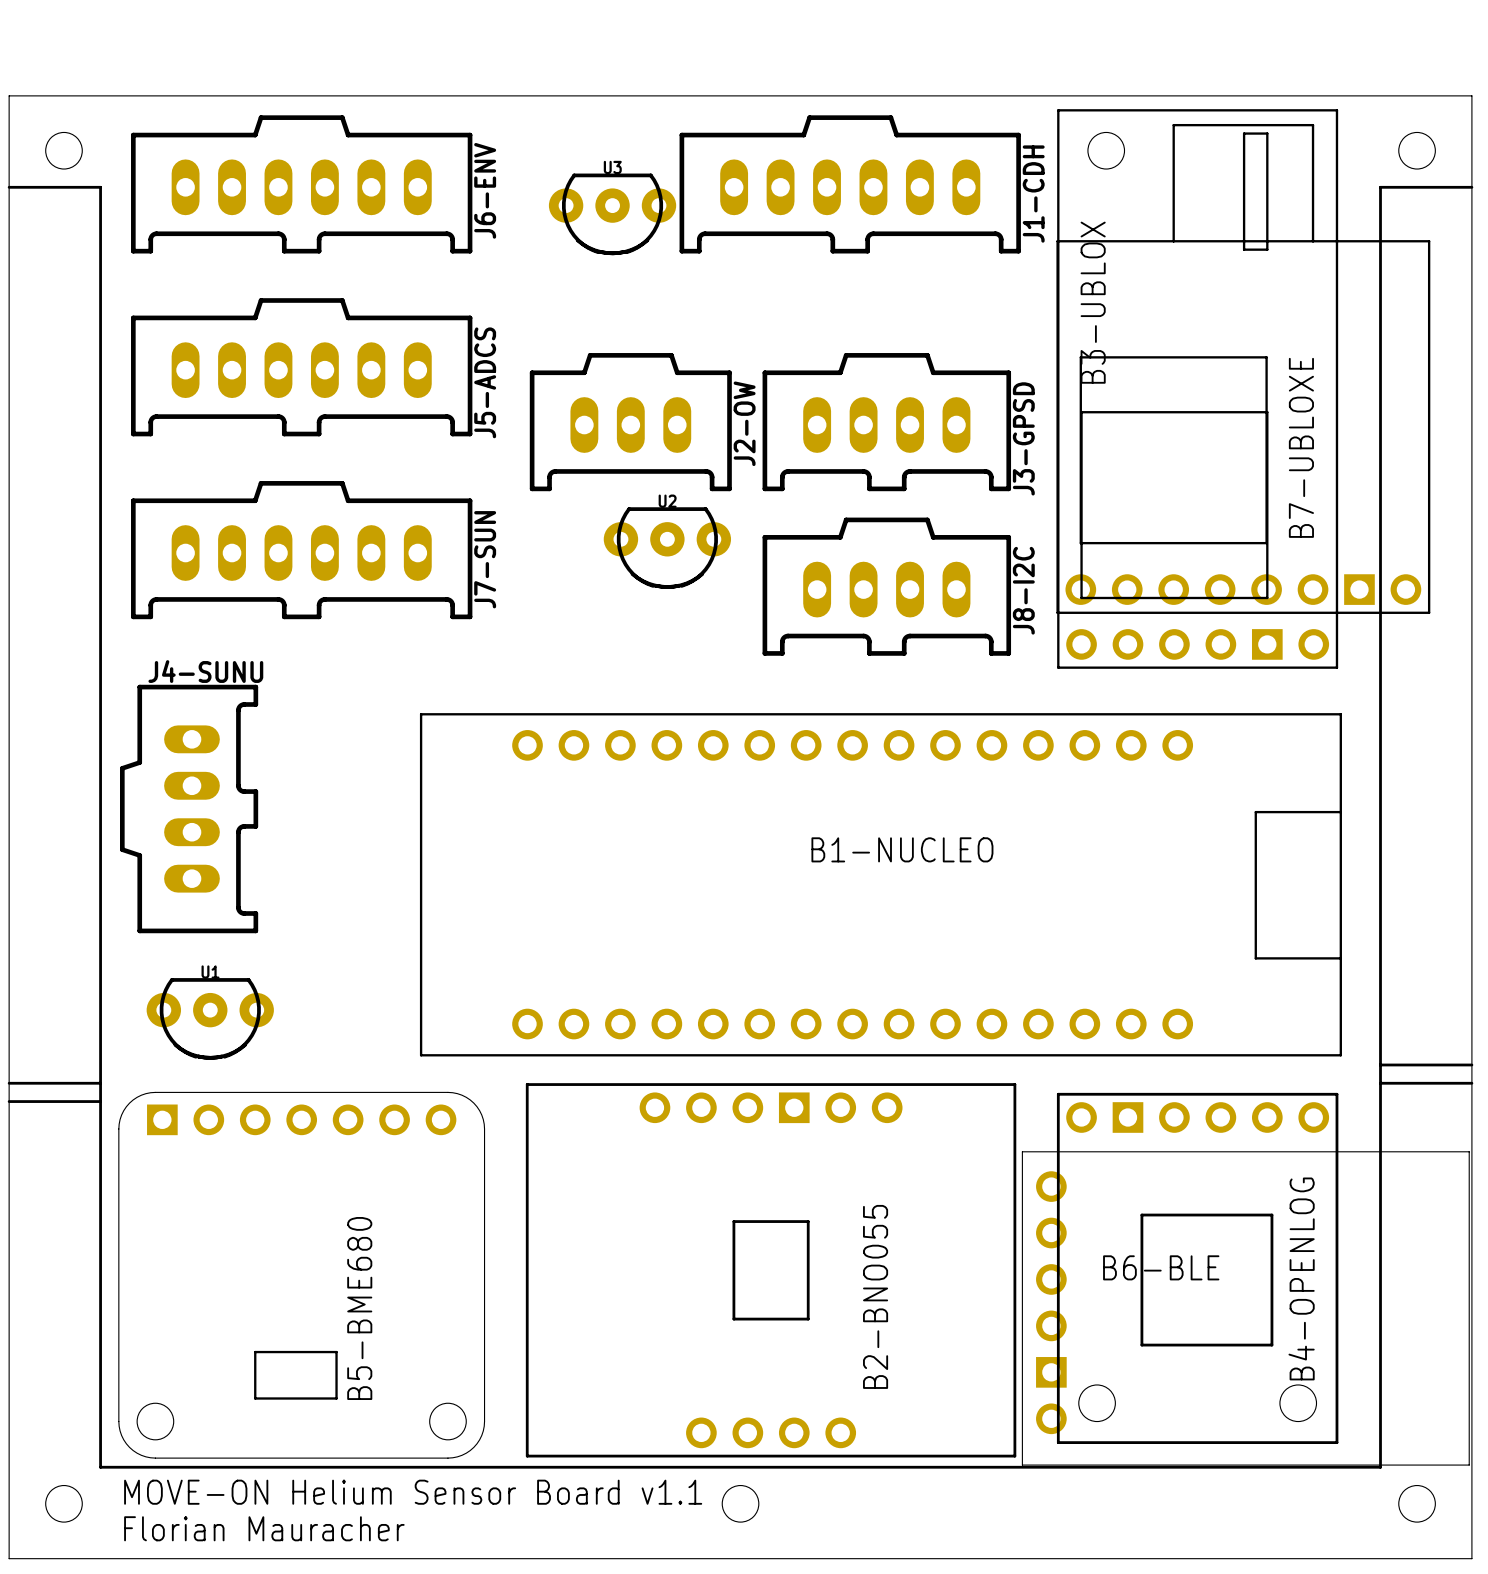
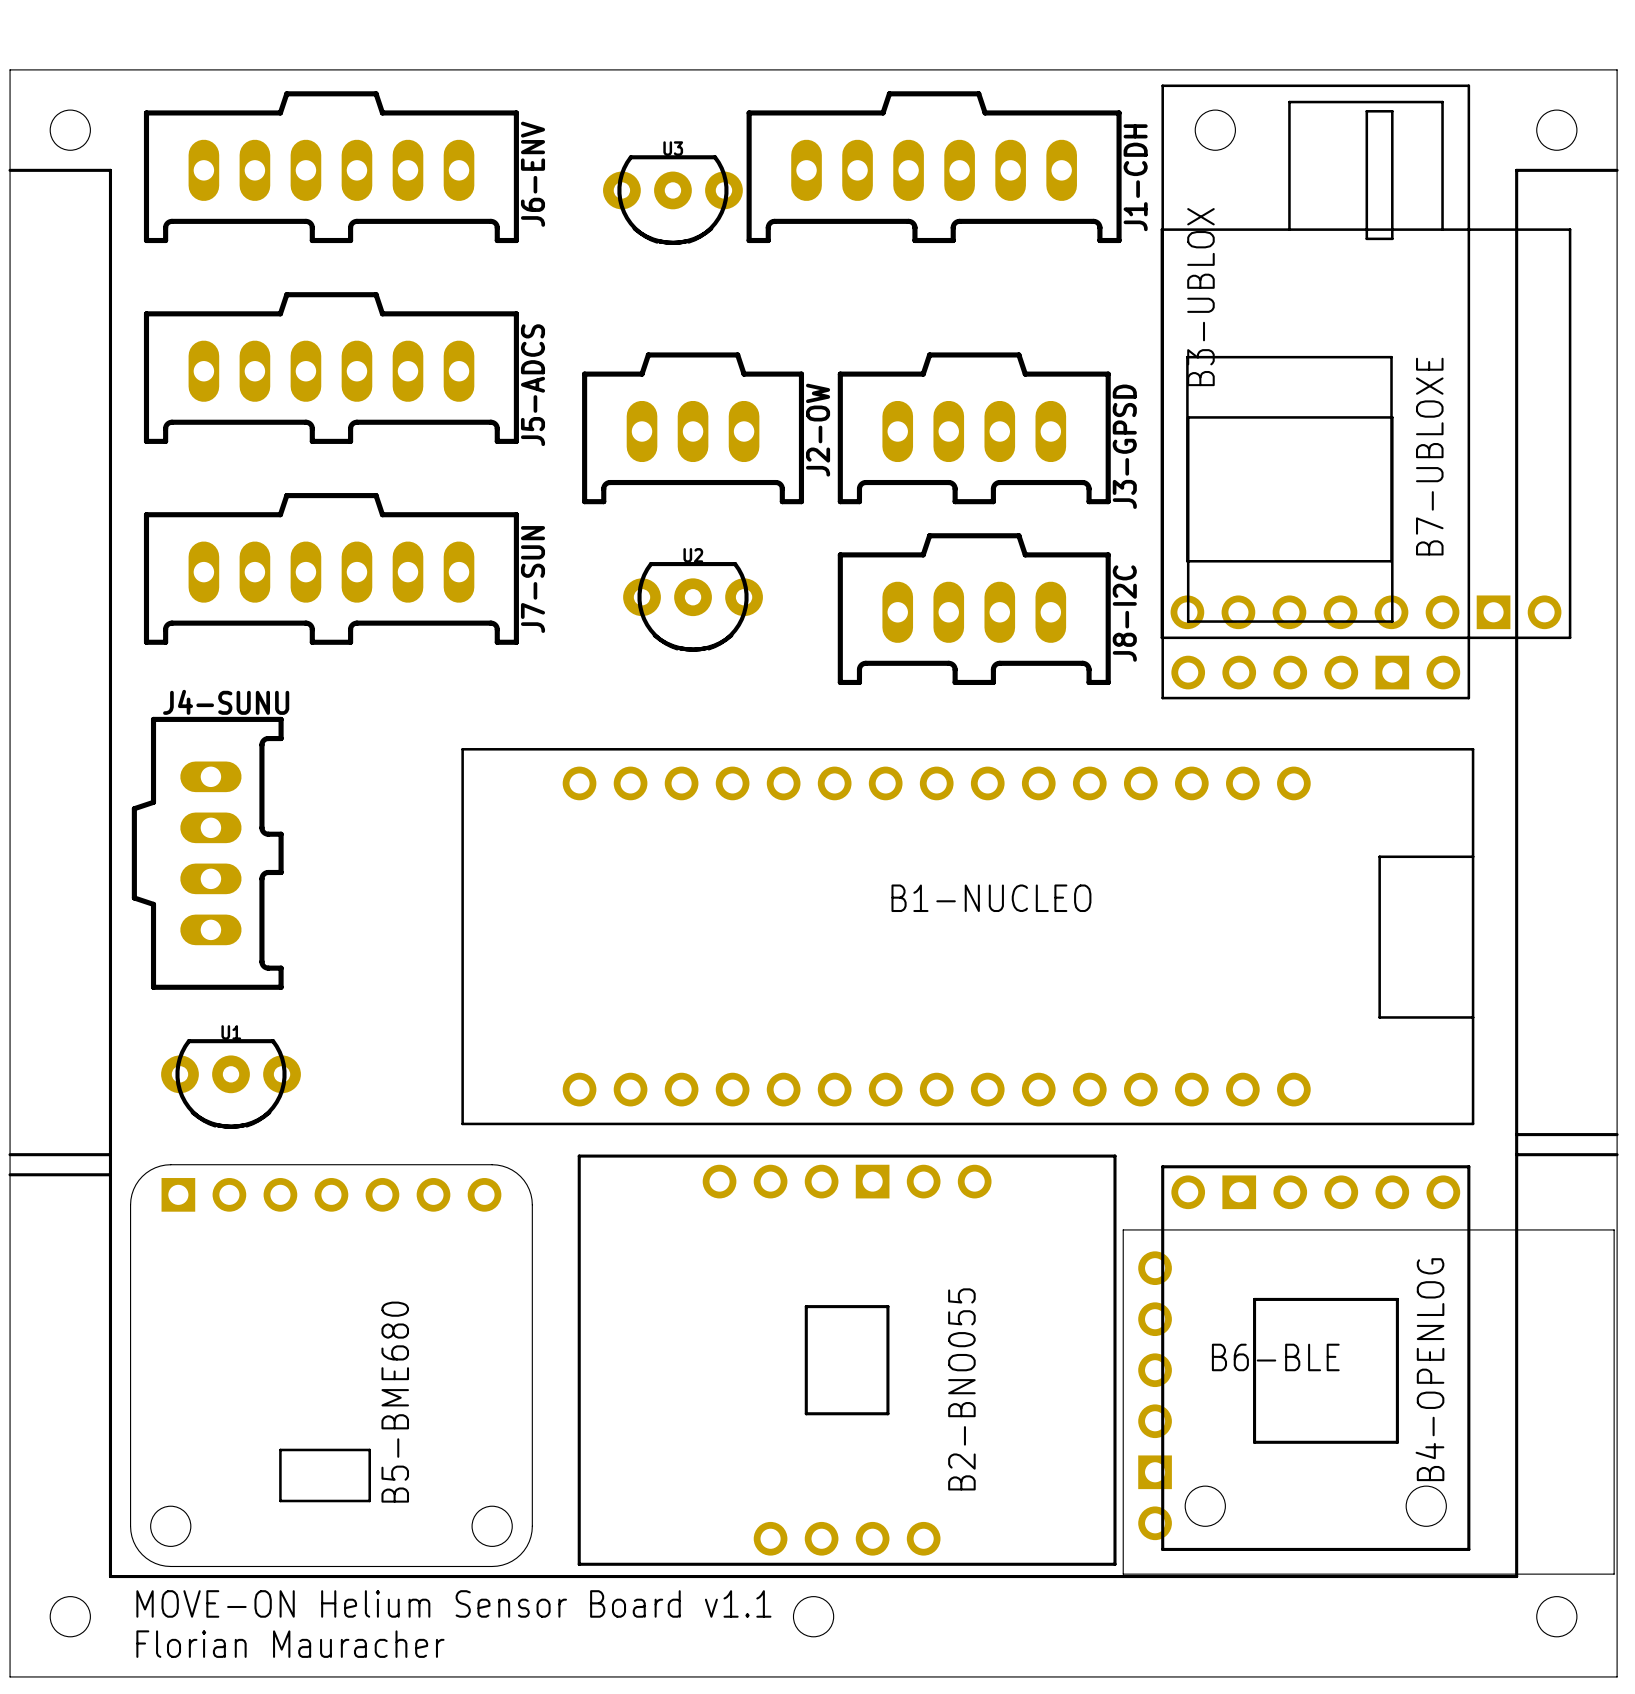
U2 position: (667, 548) -> (693, 606)

